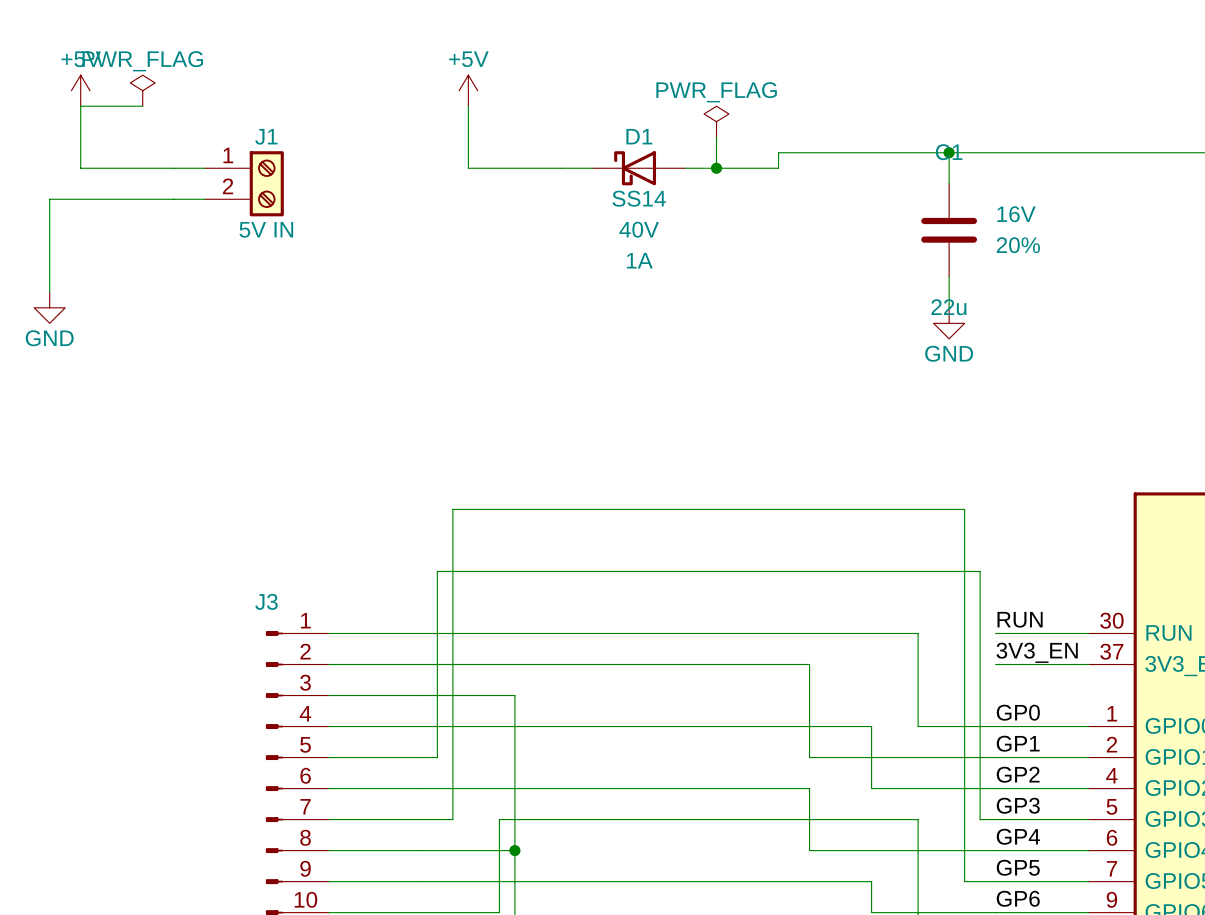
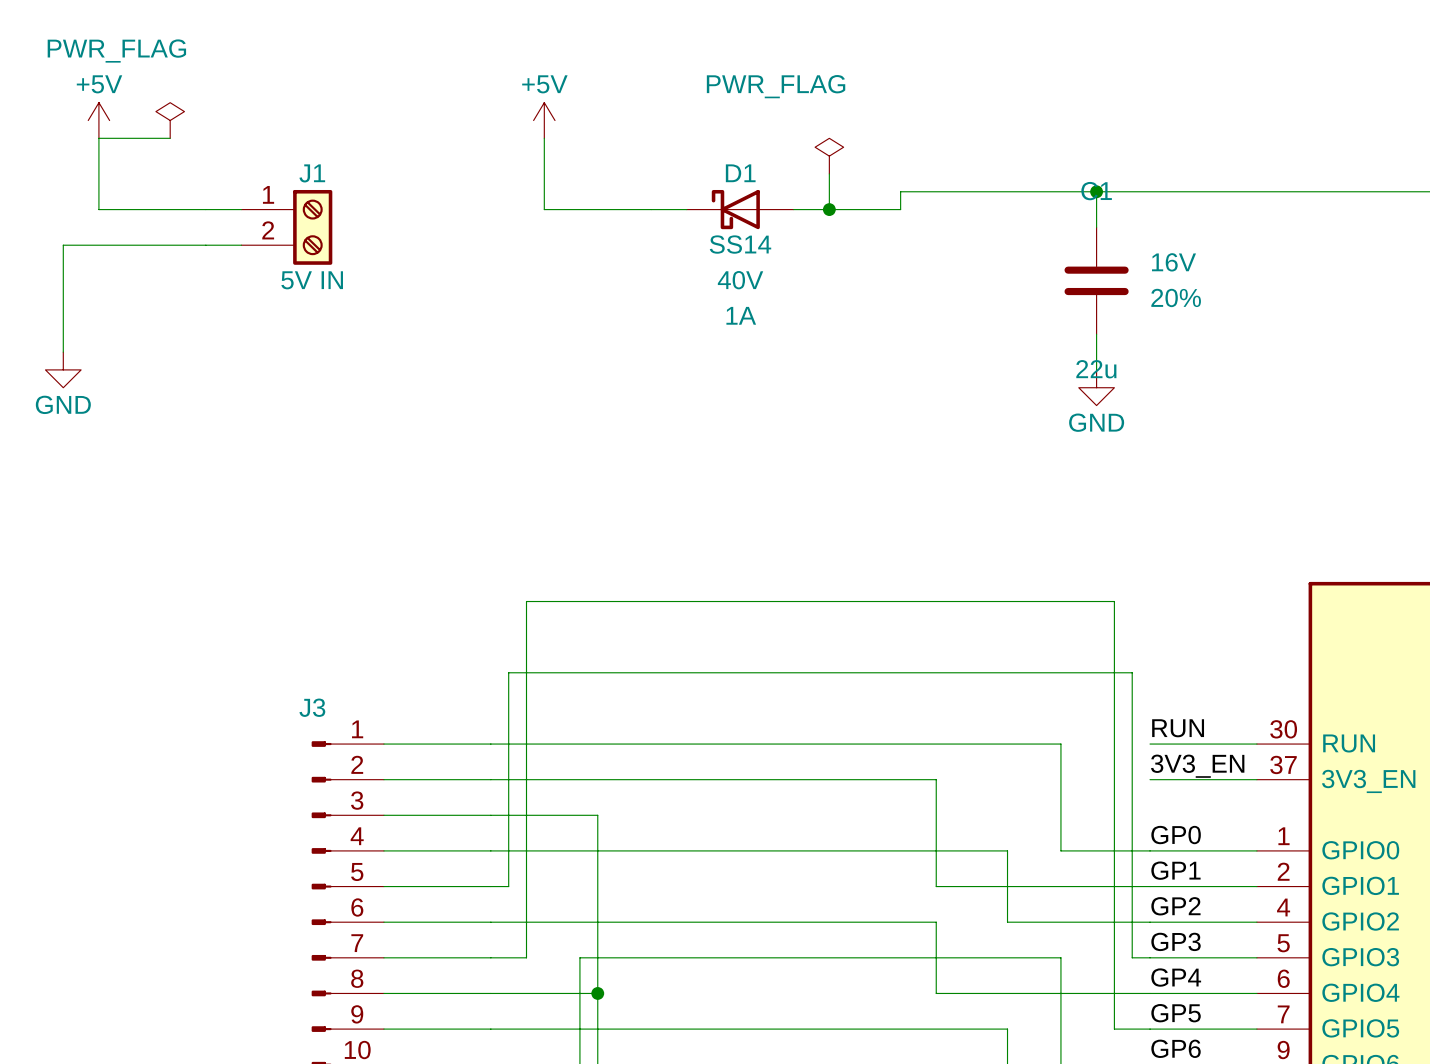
power symbol text position: PWR_FLAG (142, 61) -> PWR_FLAG (116, 51)
power symbol text position: PWR_FLAG (716, 92) -> PWR_FLAG (776, 86)

